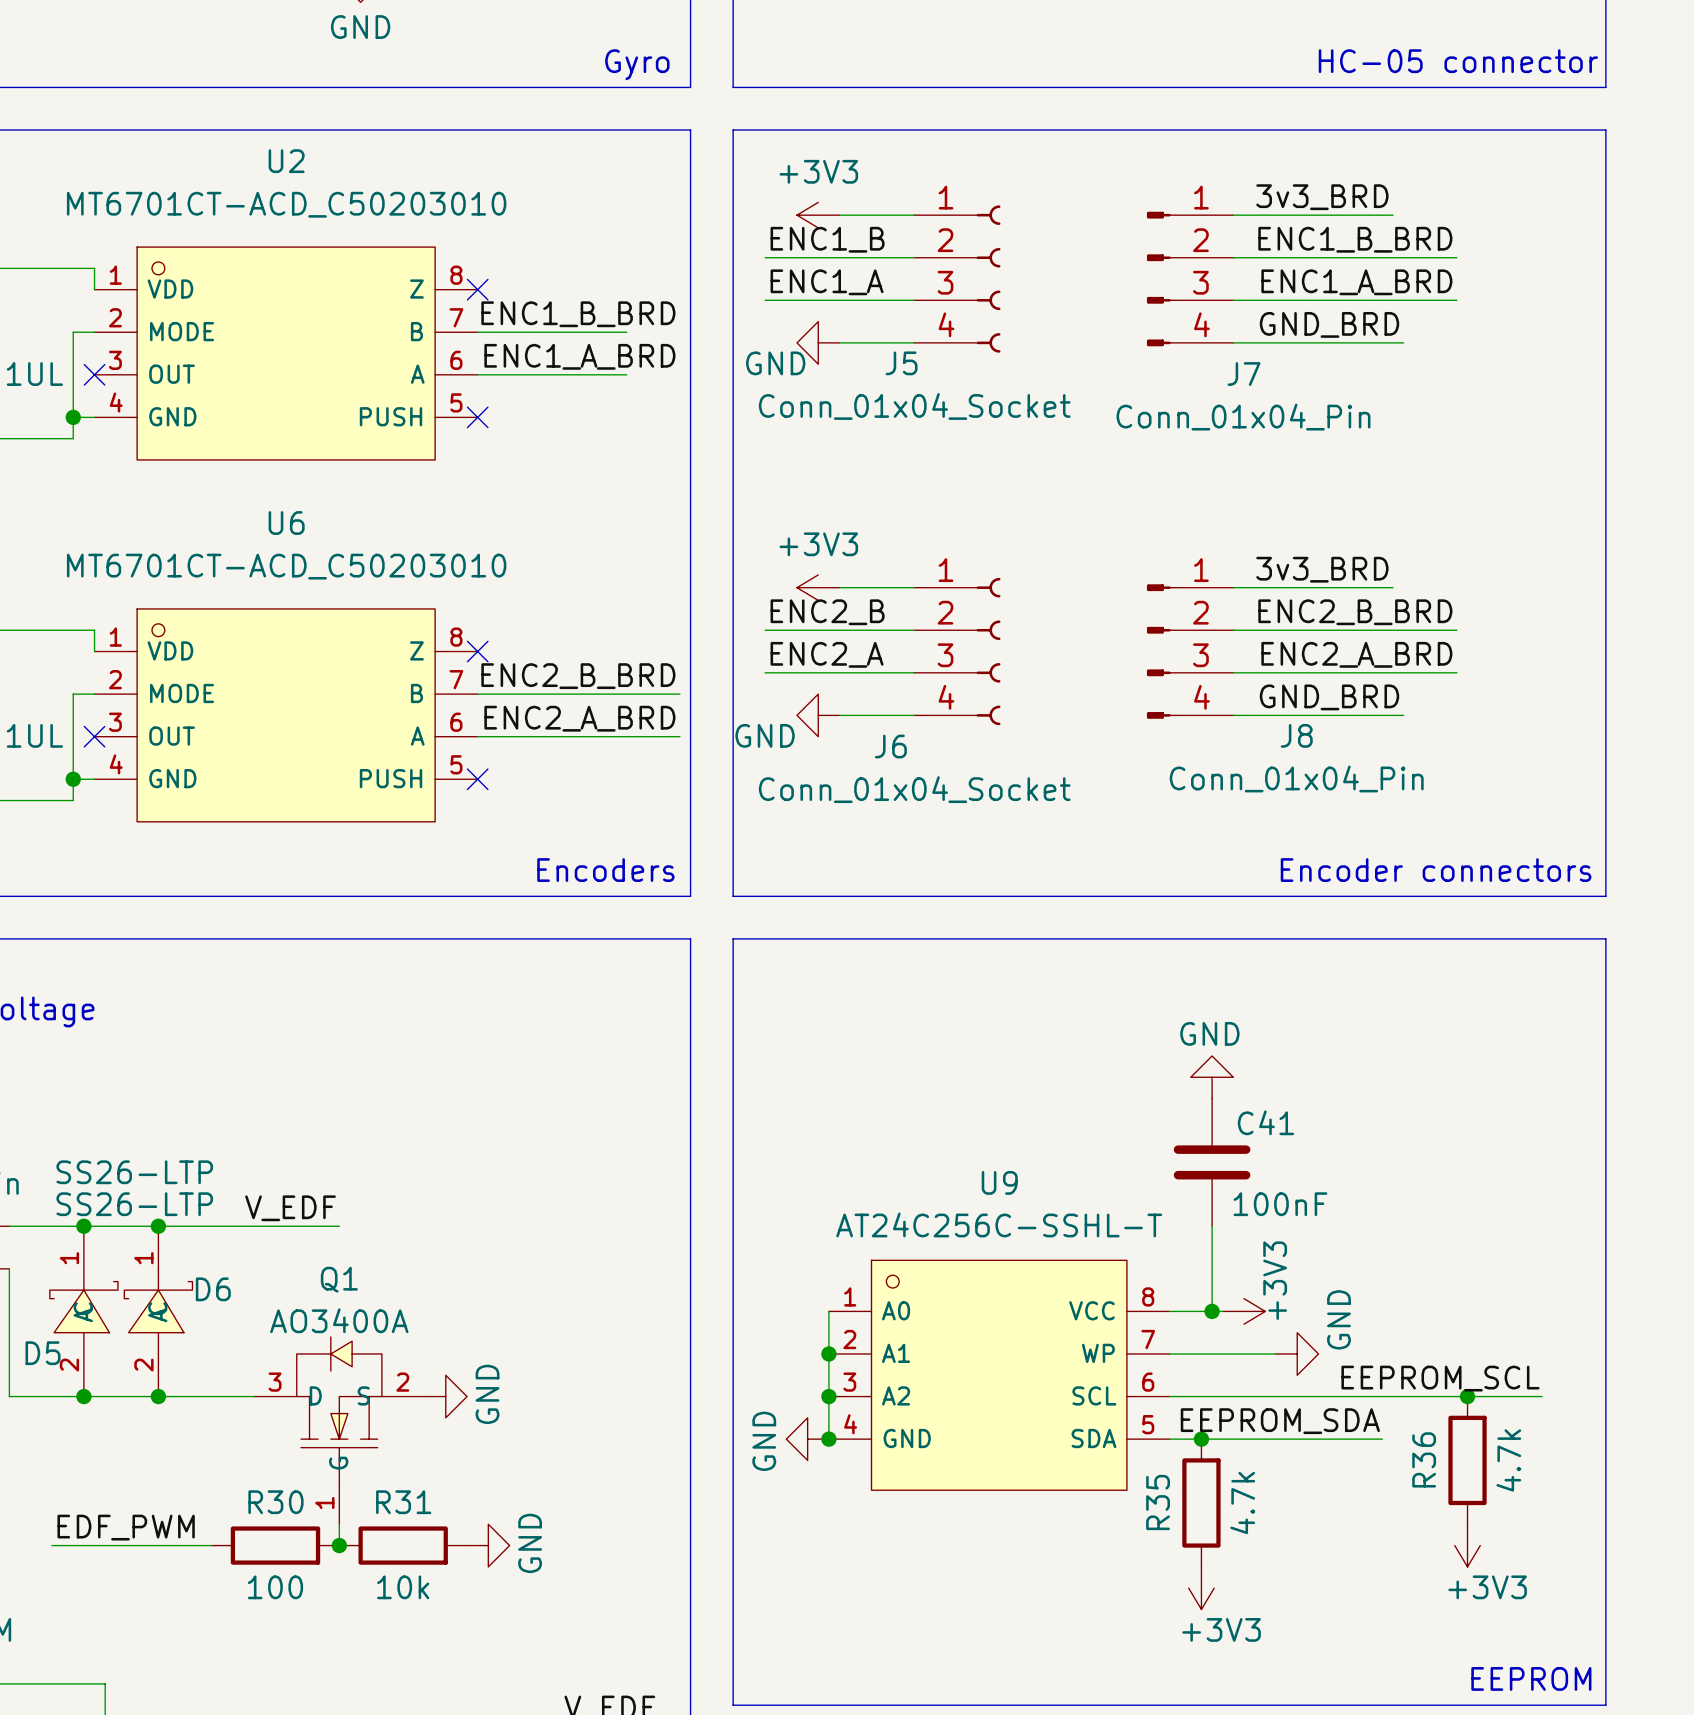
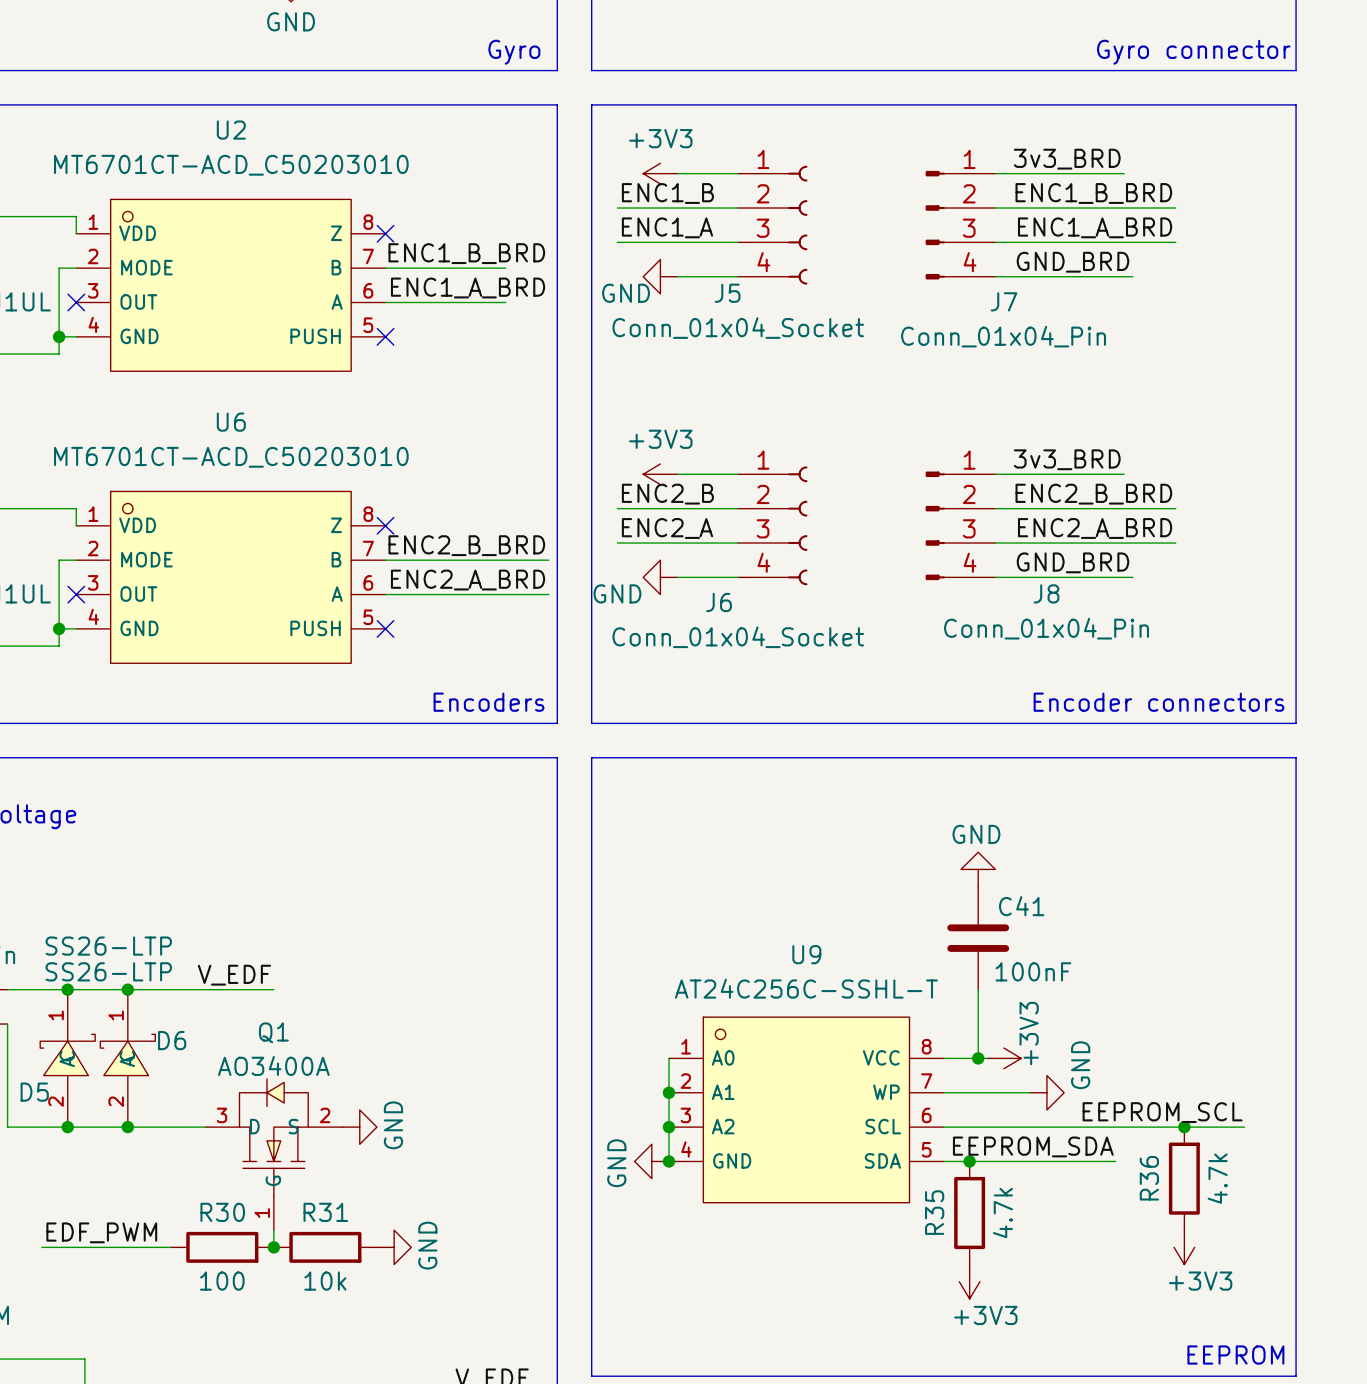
text: HC-05 connector (1458, 61) -> Gyro connector (1193, 52)

